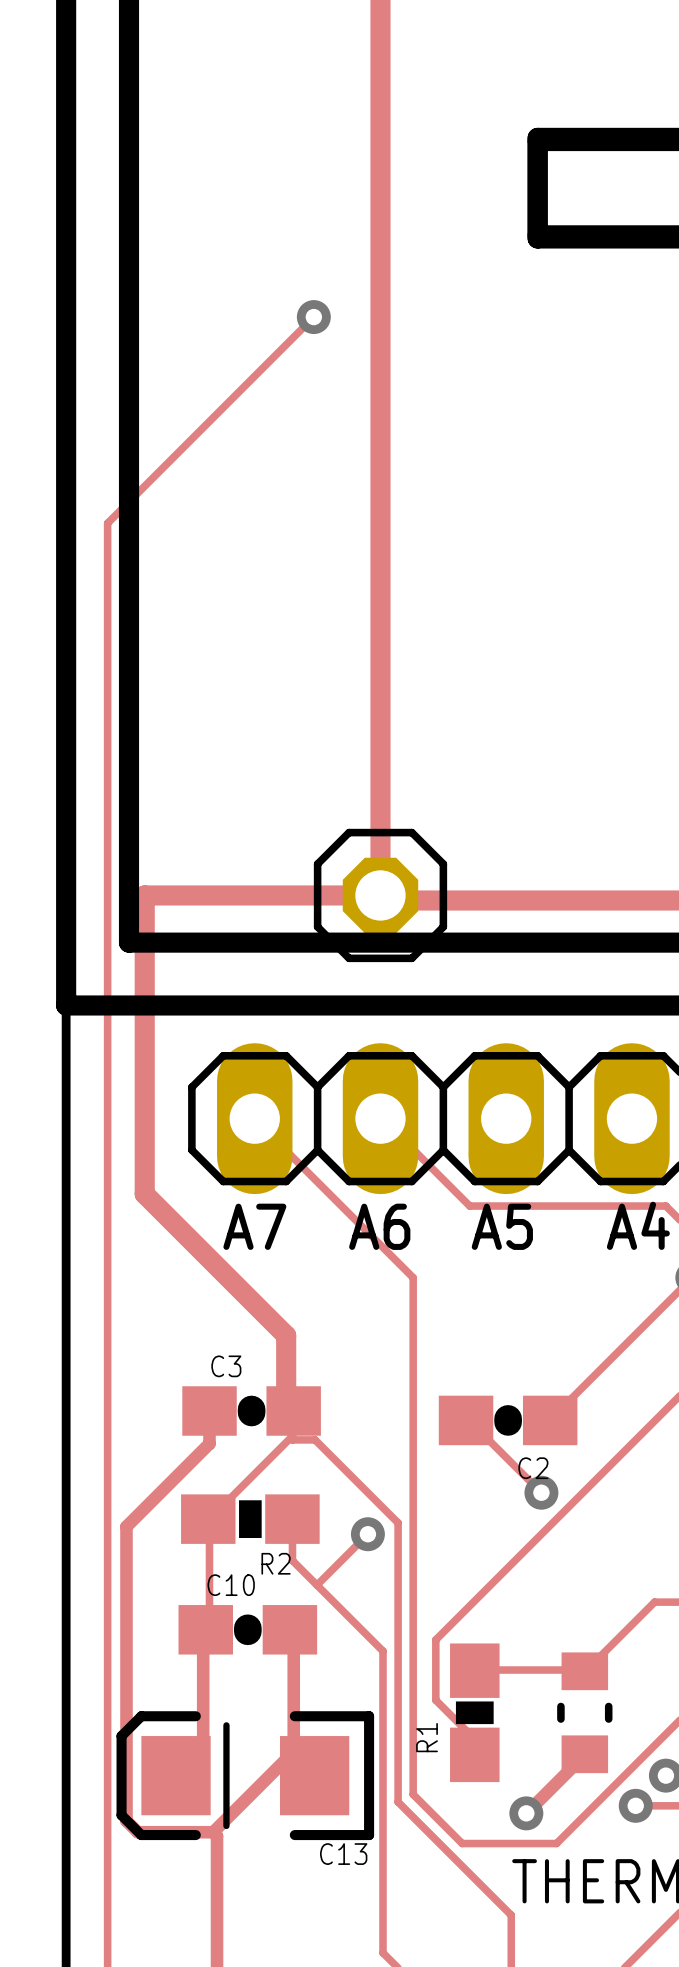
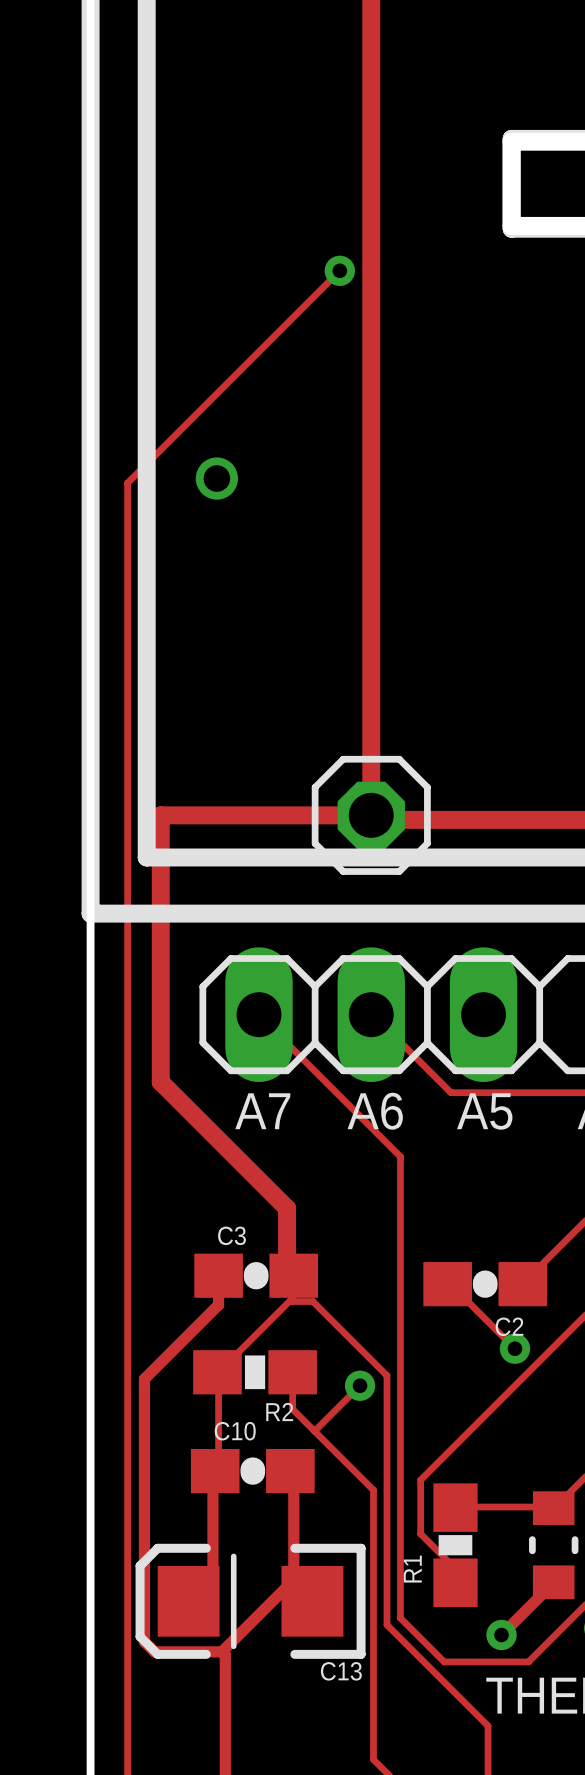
track: none -> (339, 270) (311, 298)
via position: (313, 317) -> (339, 270)
via: none -> (216, 478)

